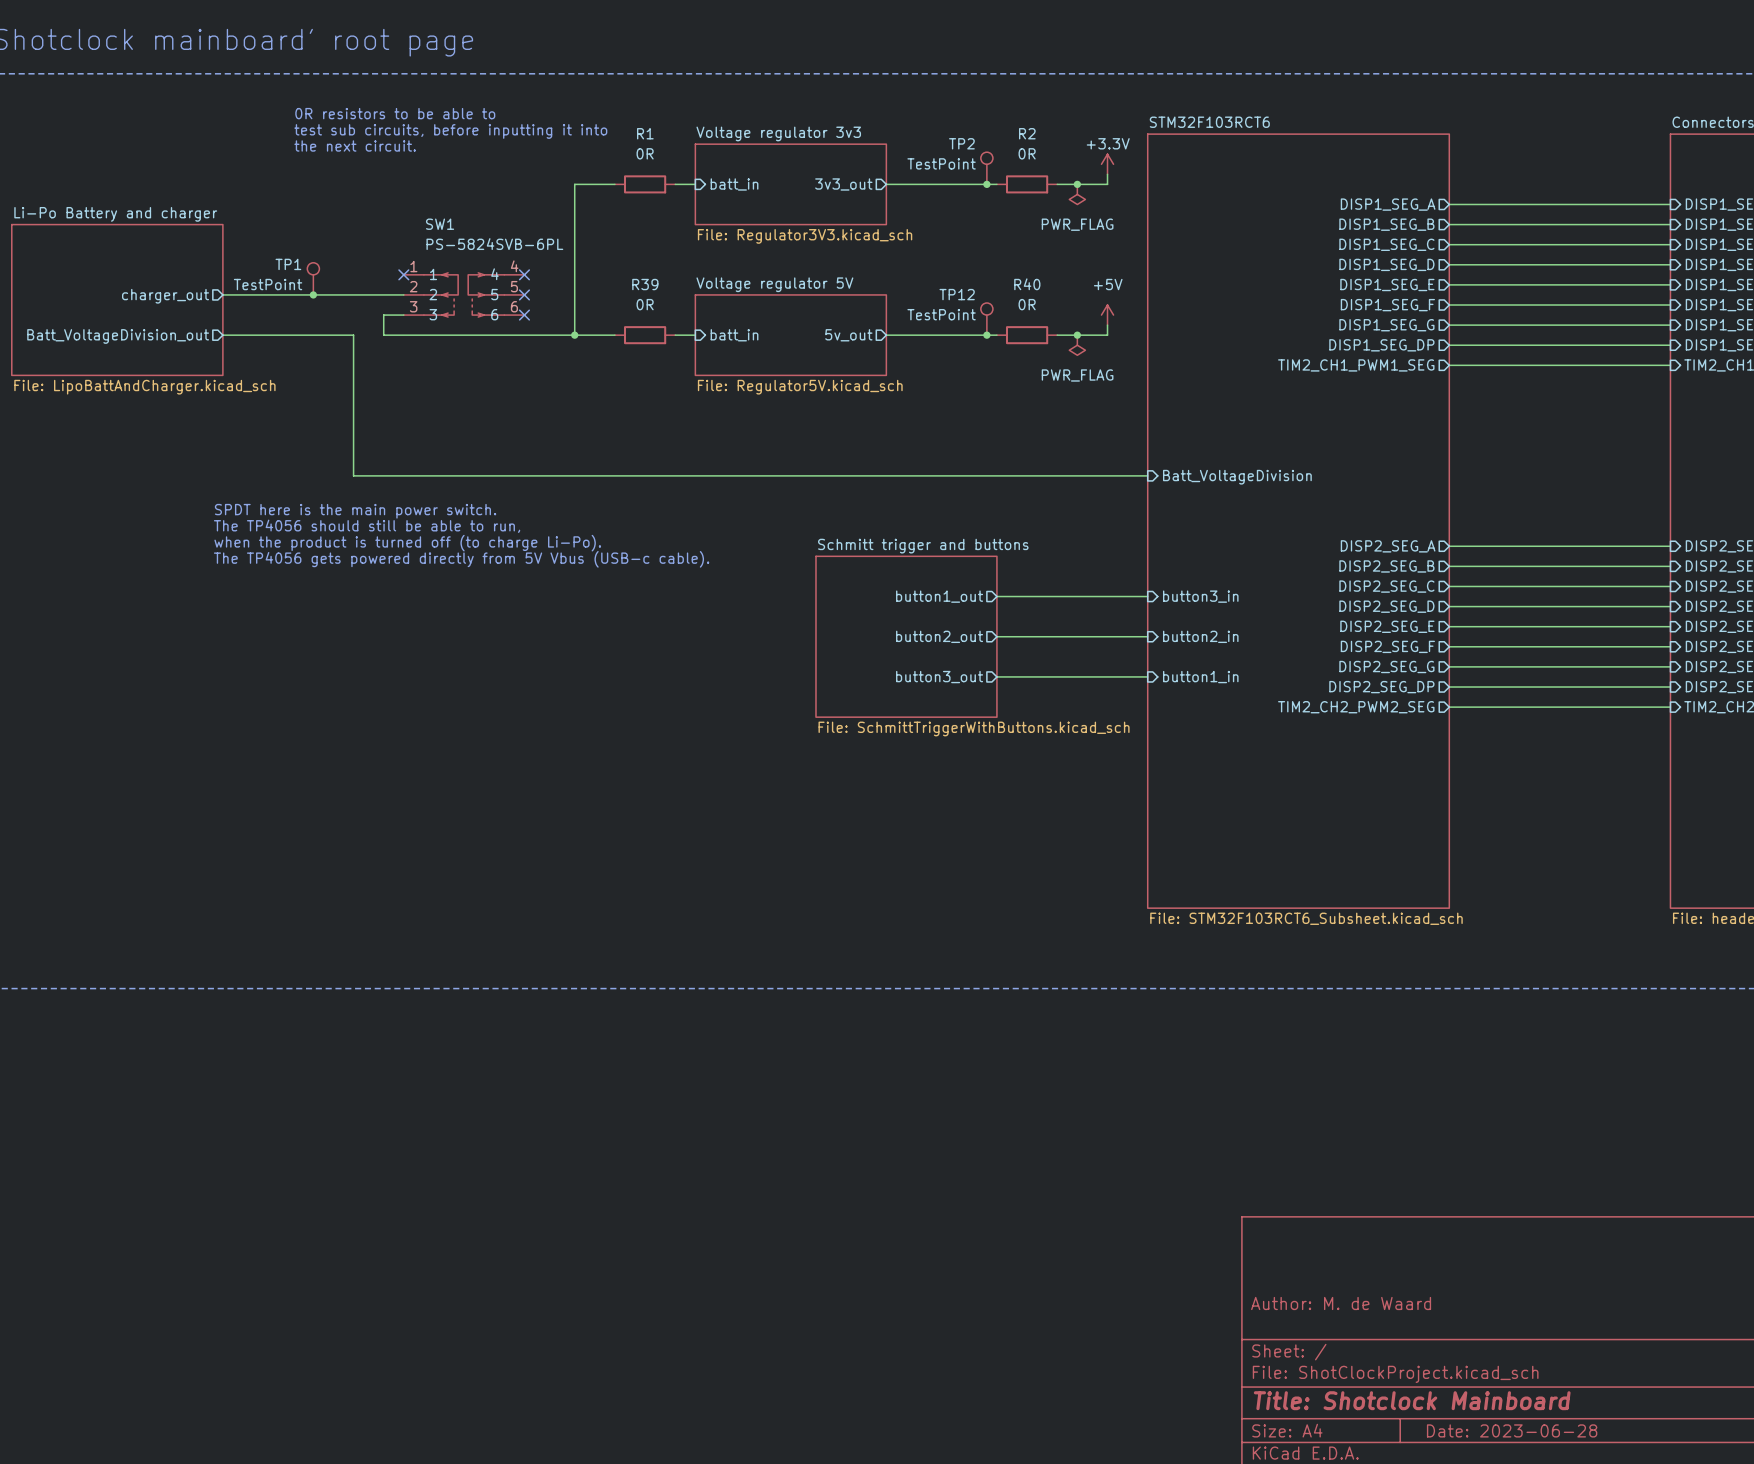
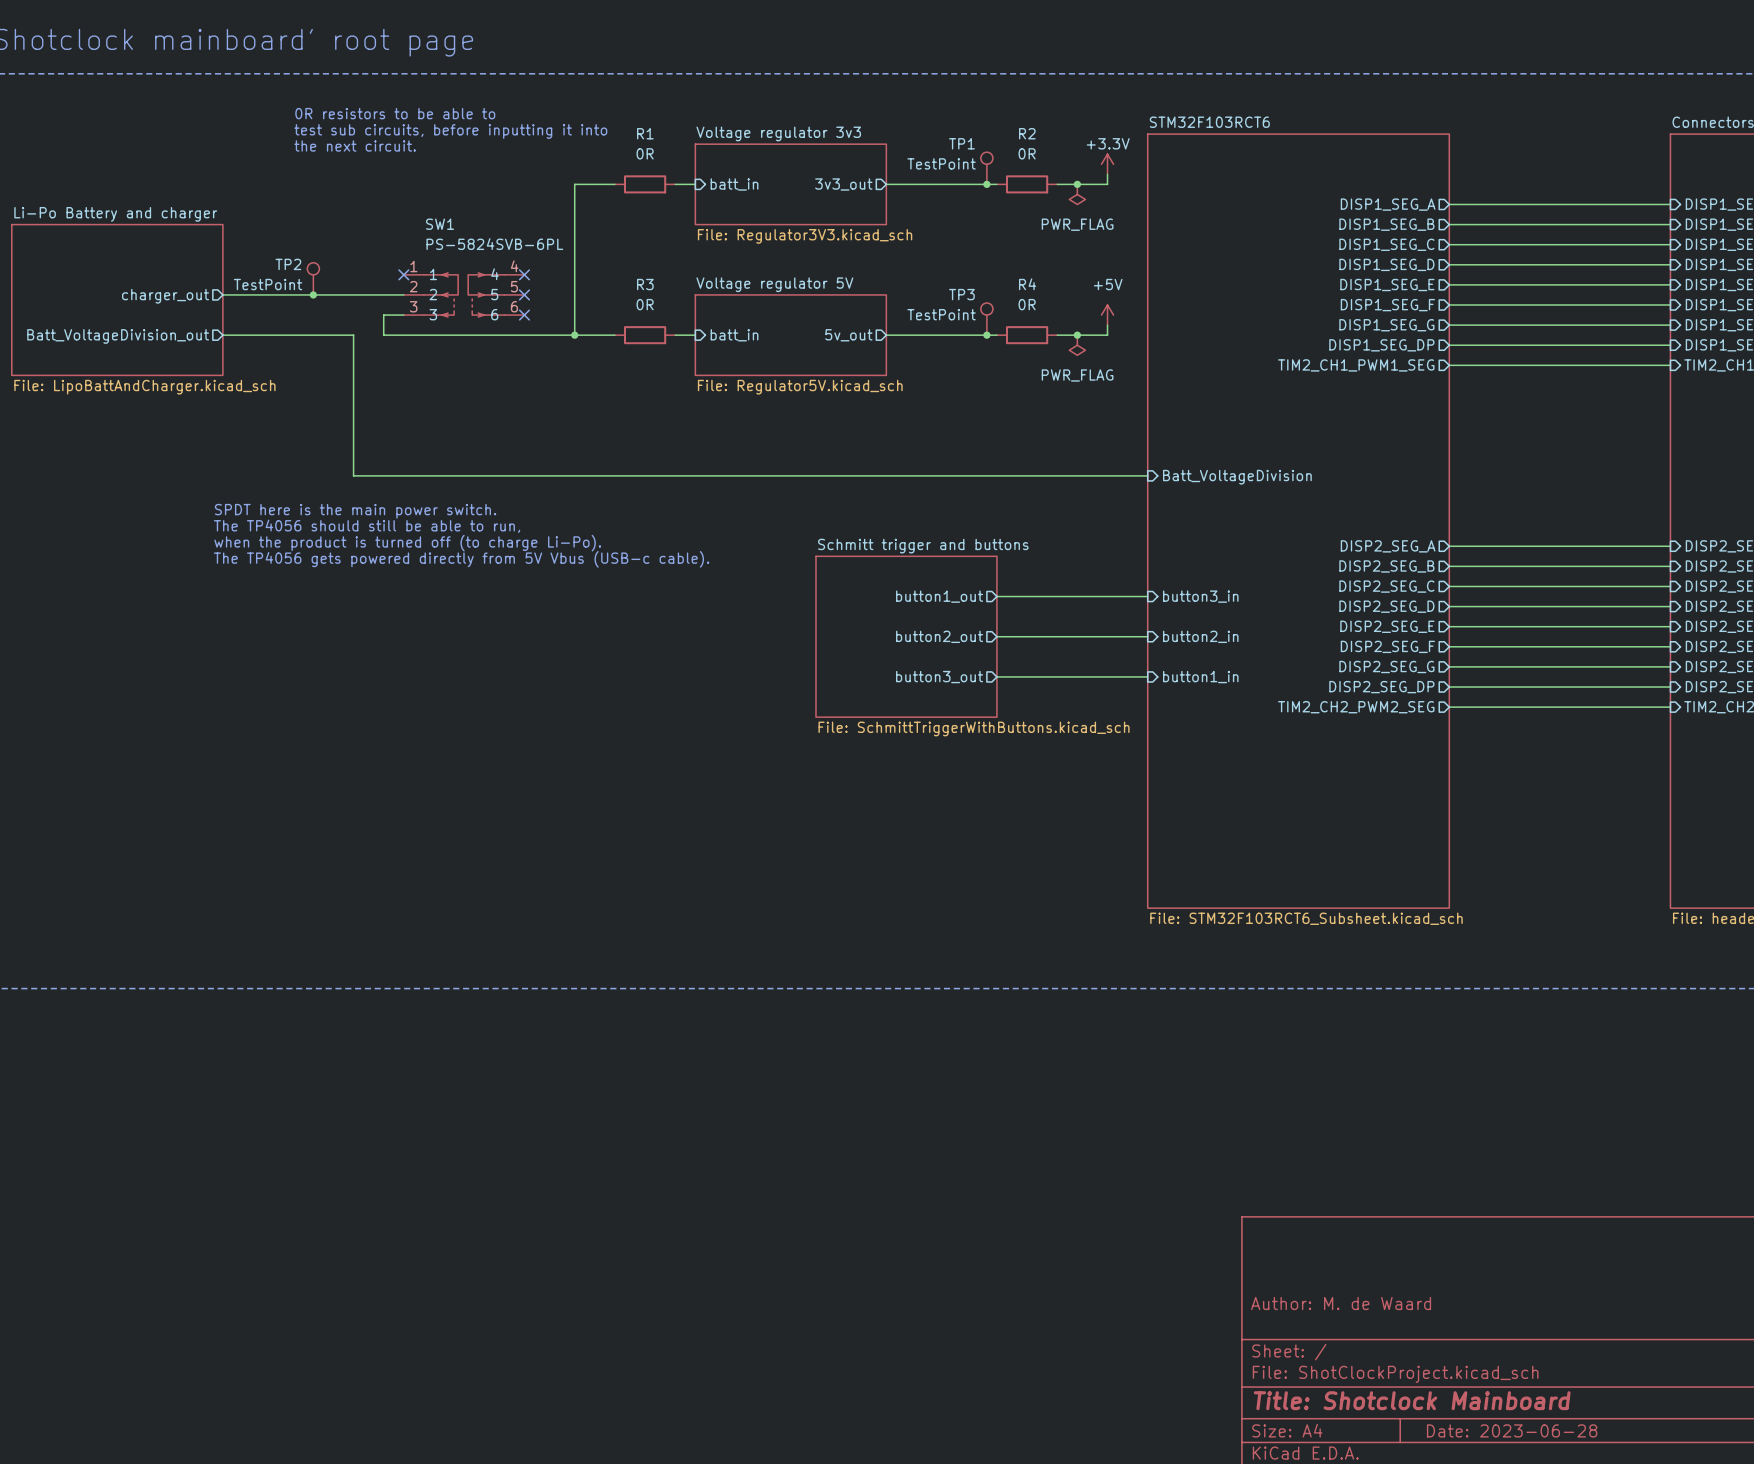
TP2 name: TP2 (961, 143) -> TP1 (961, 143)
TP1 name: TP1 (288, 264) -> TP2 (288, 264)
R39 name: R39 (645, 284) -> R3 (645, 284)
R40 name: R40 (1027, 284) -> R4 (1027, 284)
TP12 name: TP12 (957, 294) -> TP3 (961, 294)

